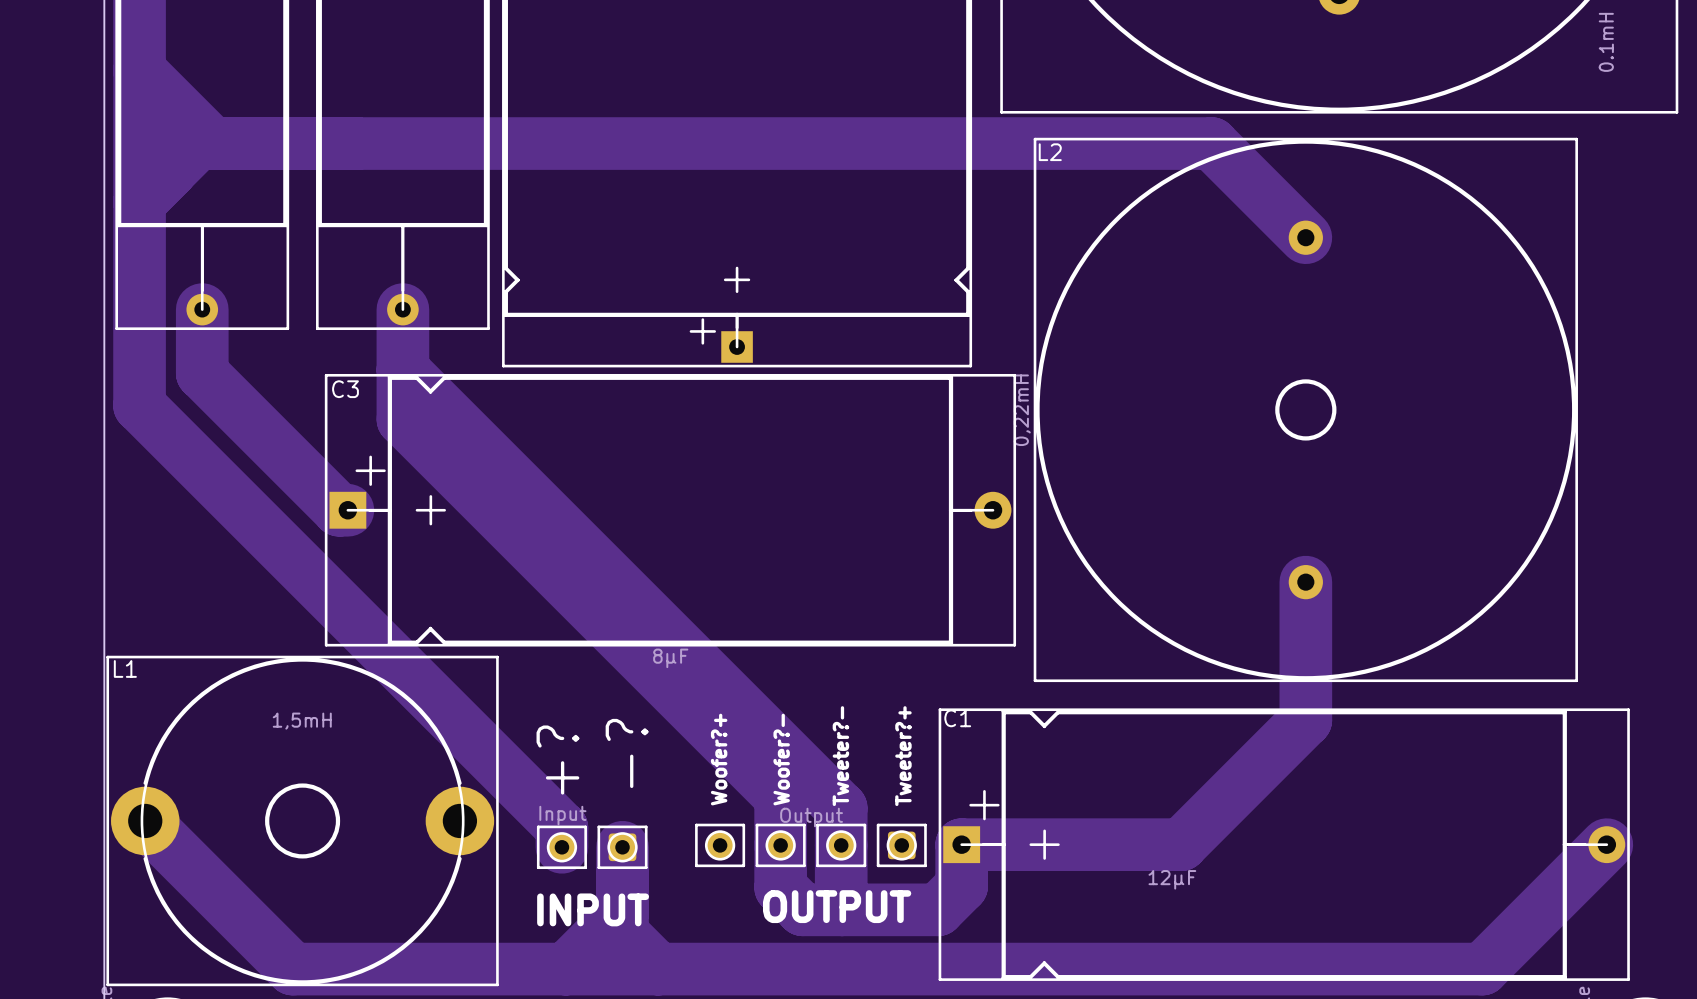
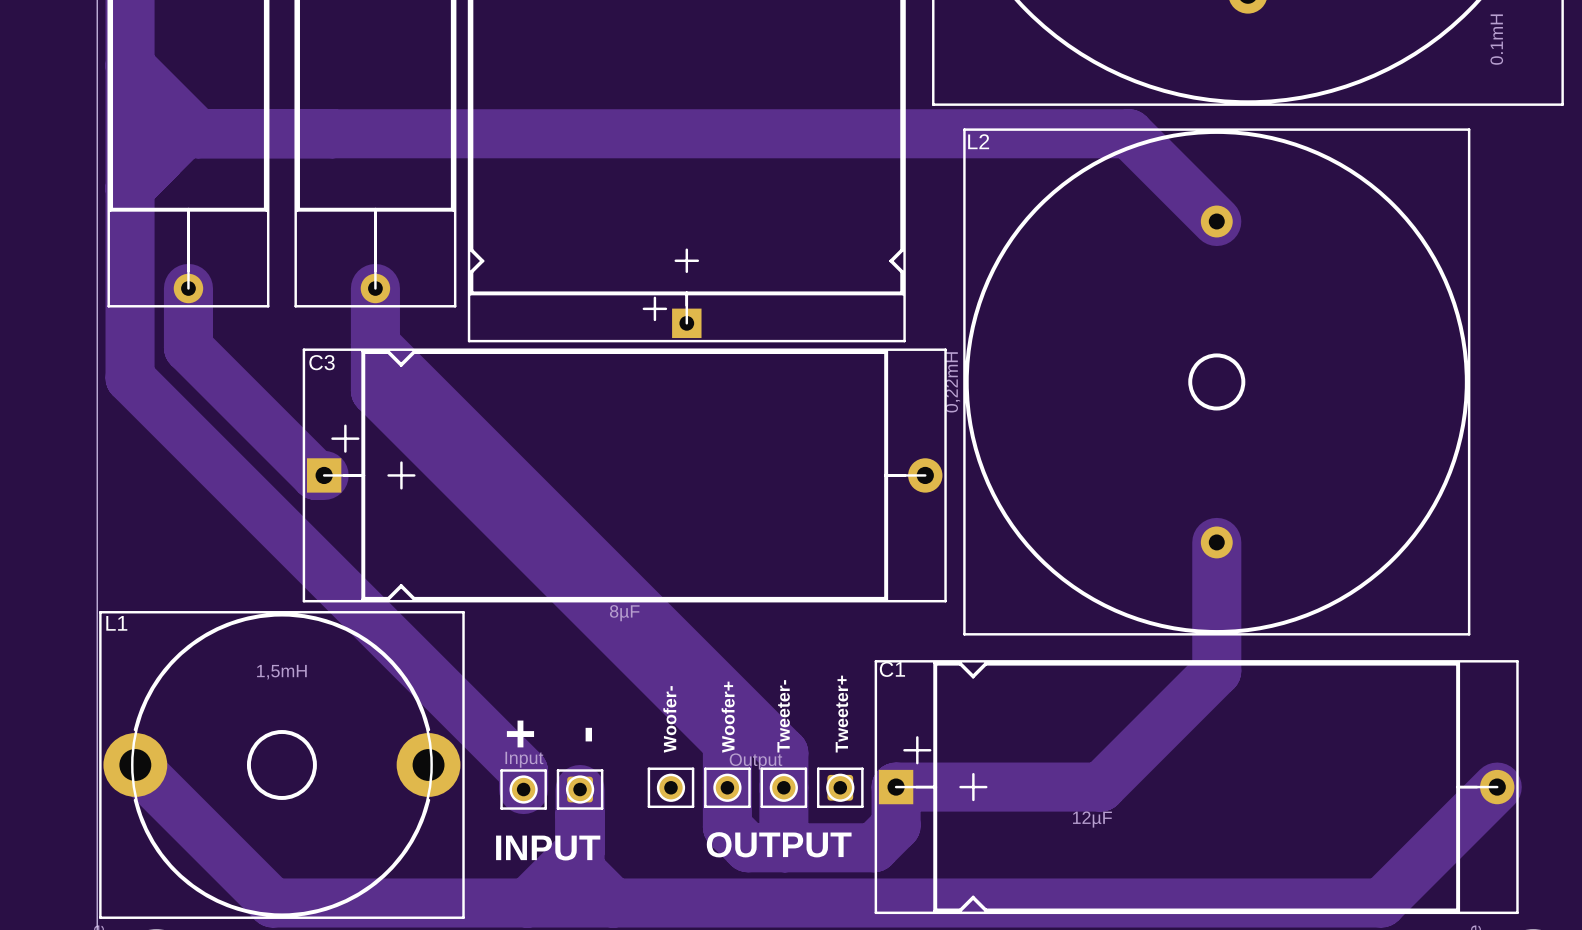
text: -? (627, 753) -> - (588, 734)
text: Tweeter?- (840, 756) -> Tweeter- (783, 716)
text: Tweeter?+ (903, 756) -> Tweeter+ (841, 714)
text: Woofer?+ (719, 759) -> Woofer- (669, 719)
text: Woofer?- (781, 759) -> Woofer+ (728, 717)
text: +? (557, 760) -> + (520, 733)

